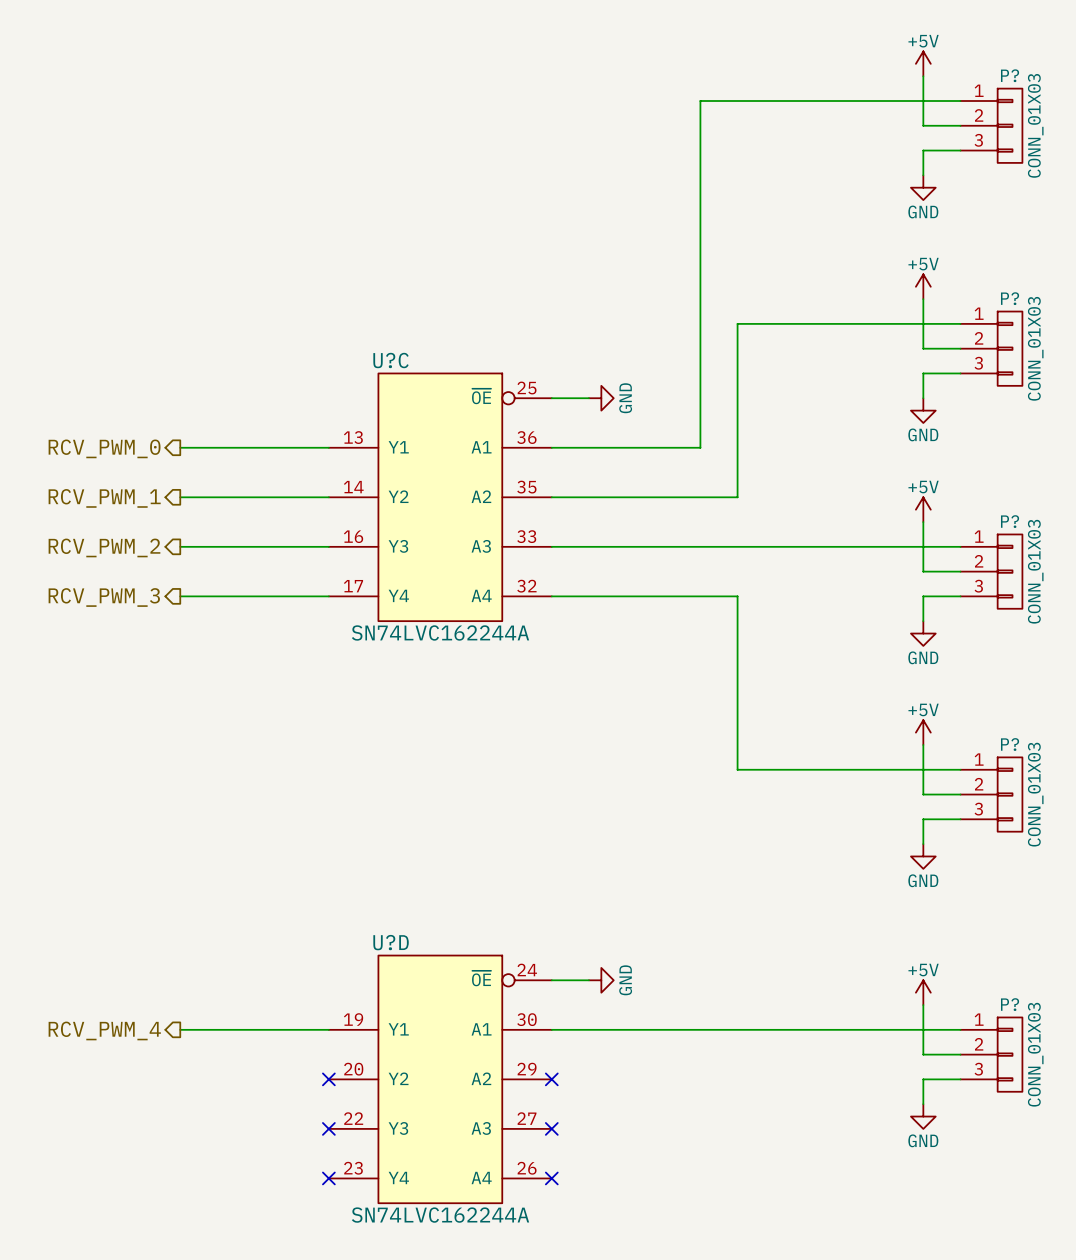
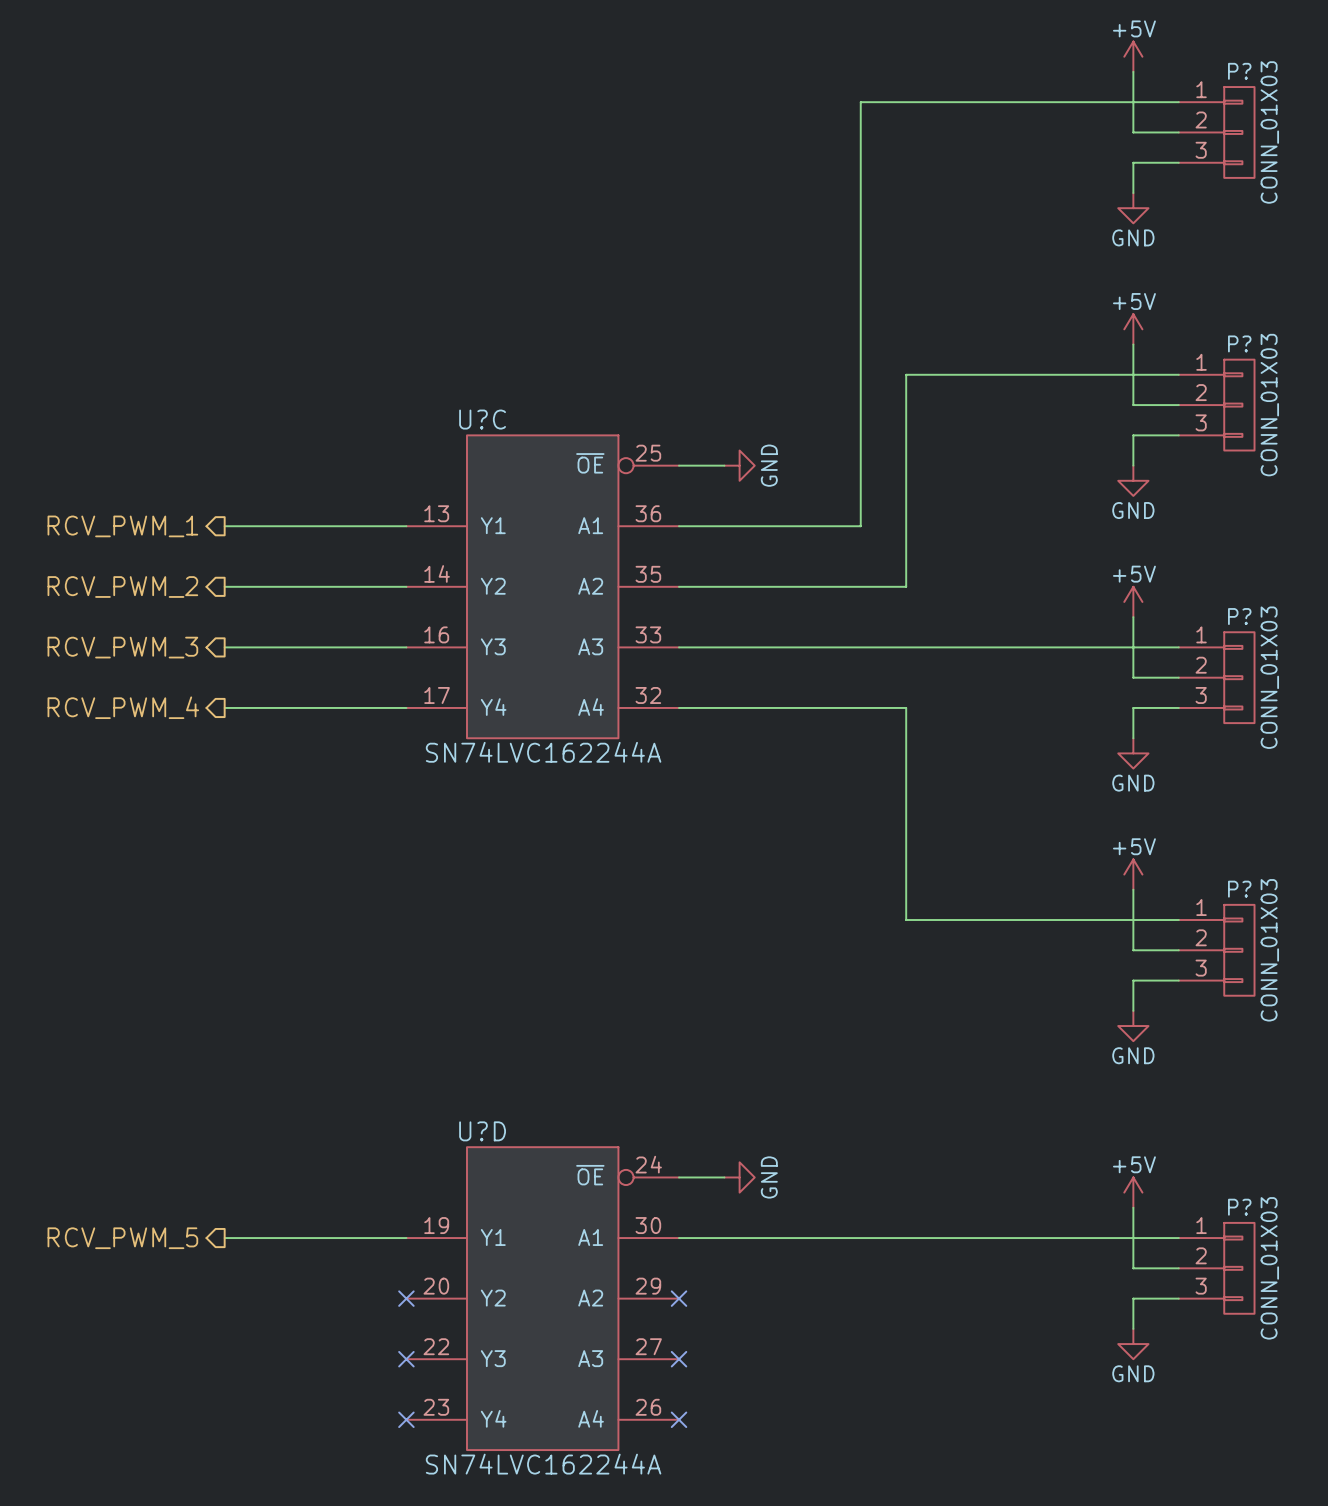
hierarchical label: RCV_PWM_0 (104, 448) -> RCV_PWM_1 (122, 526)
hierarchical label: RCV_PWM_1 (104, 498) -> RCV_PWM_2 (122, 587)
hierarchical label: RCV_PWM_2 (104, 547) -> RCV_PWM_3 (122, 647)
hierarchical label: RCV_PWM_3 (104, 597) -> RCV_PWM_4 (123, 707)
hierarchical label: RCV_PWM_4 (104, 1030) -> RCV_PWM_5 (122, 1238)

